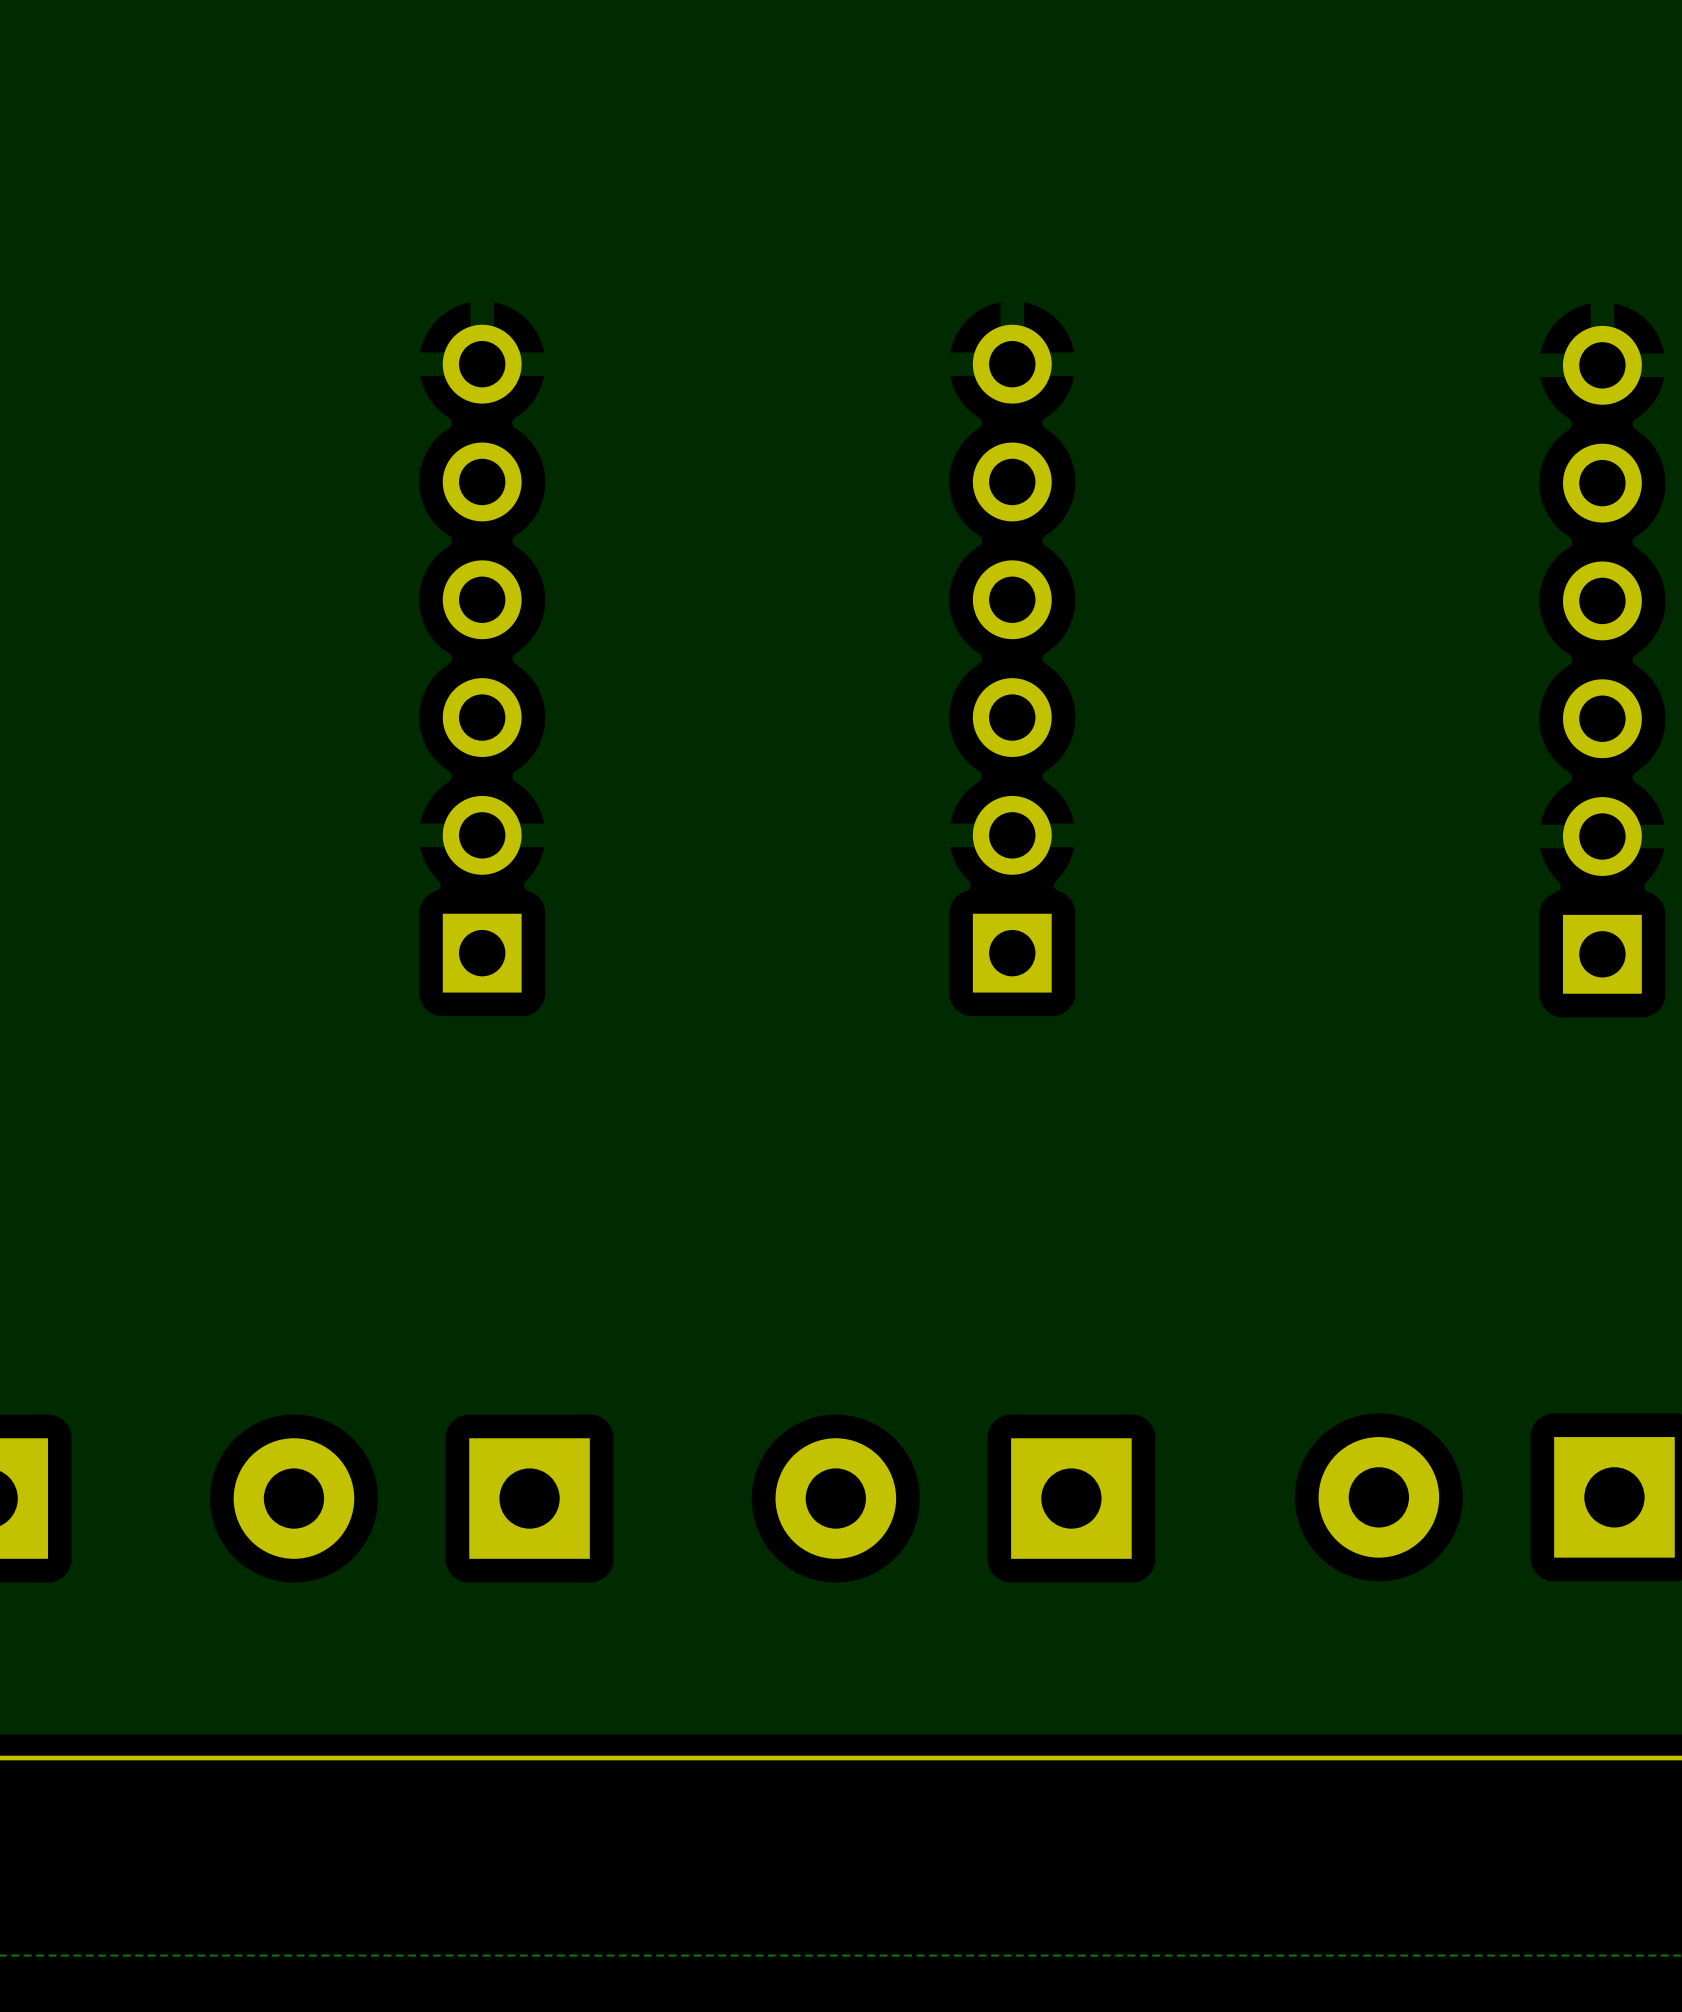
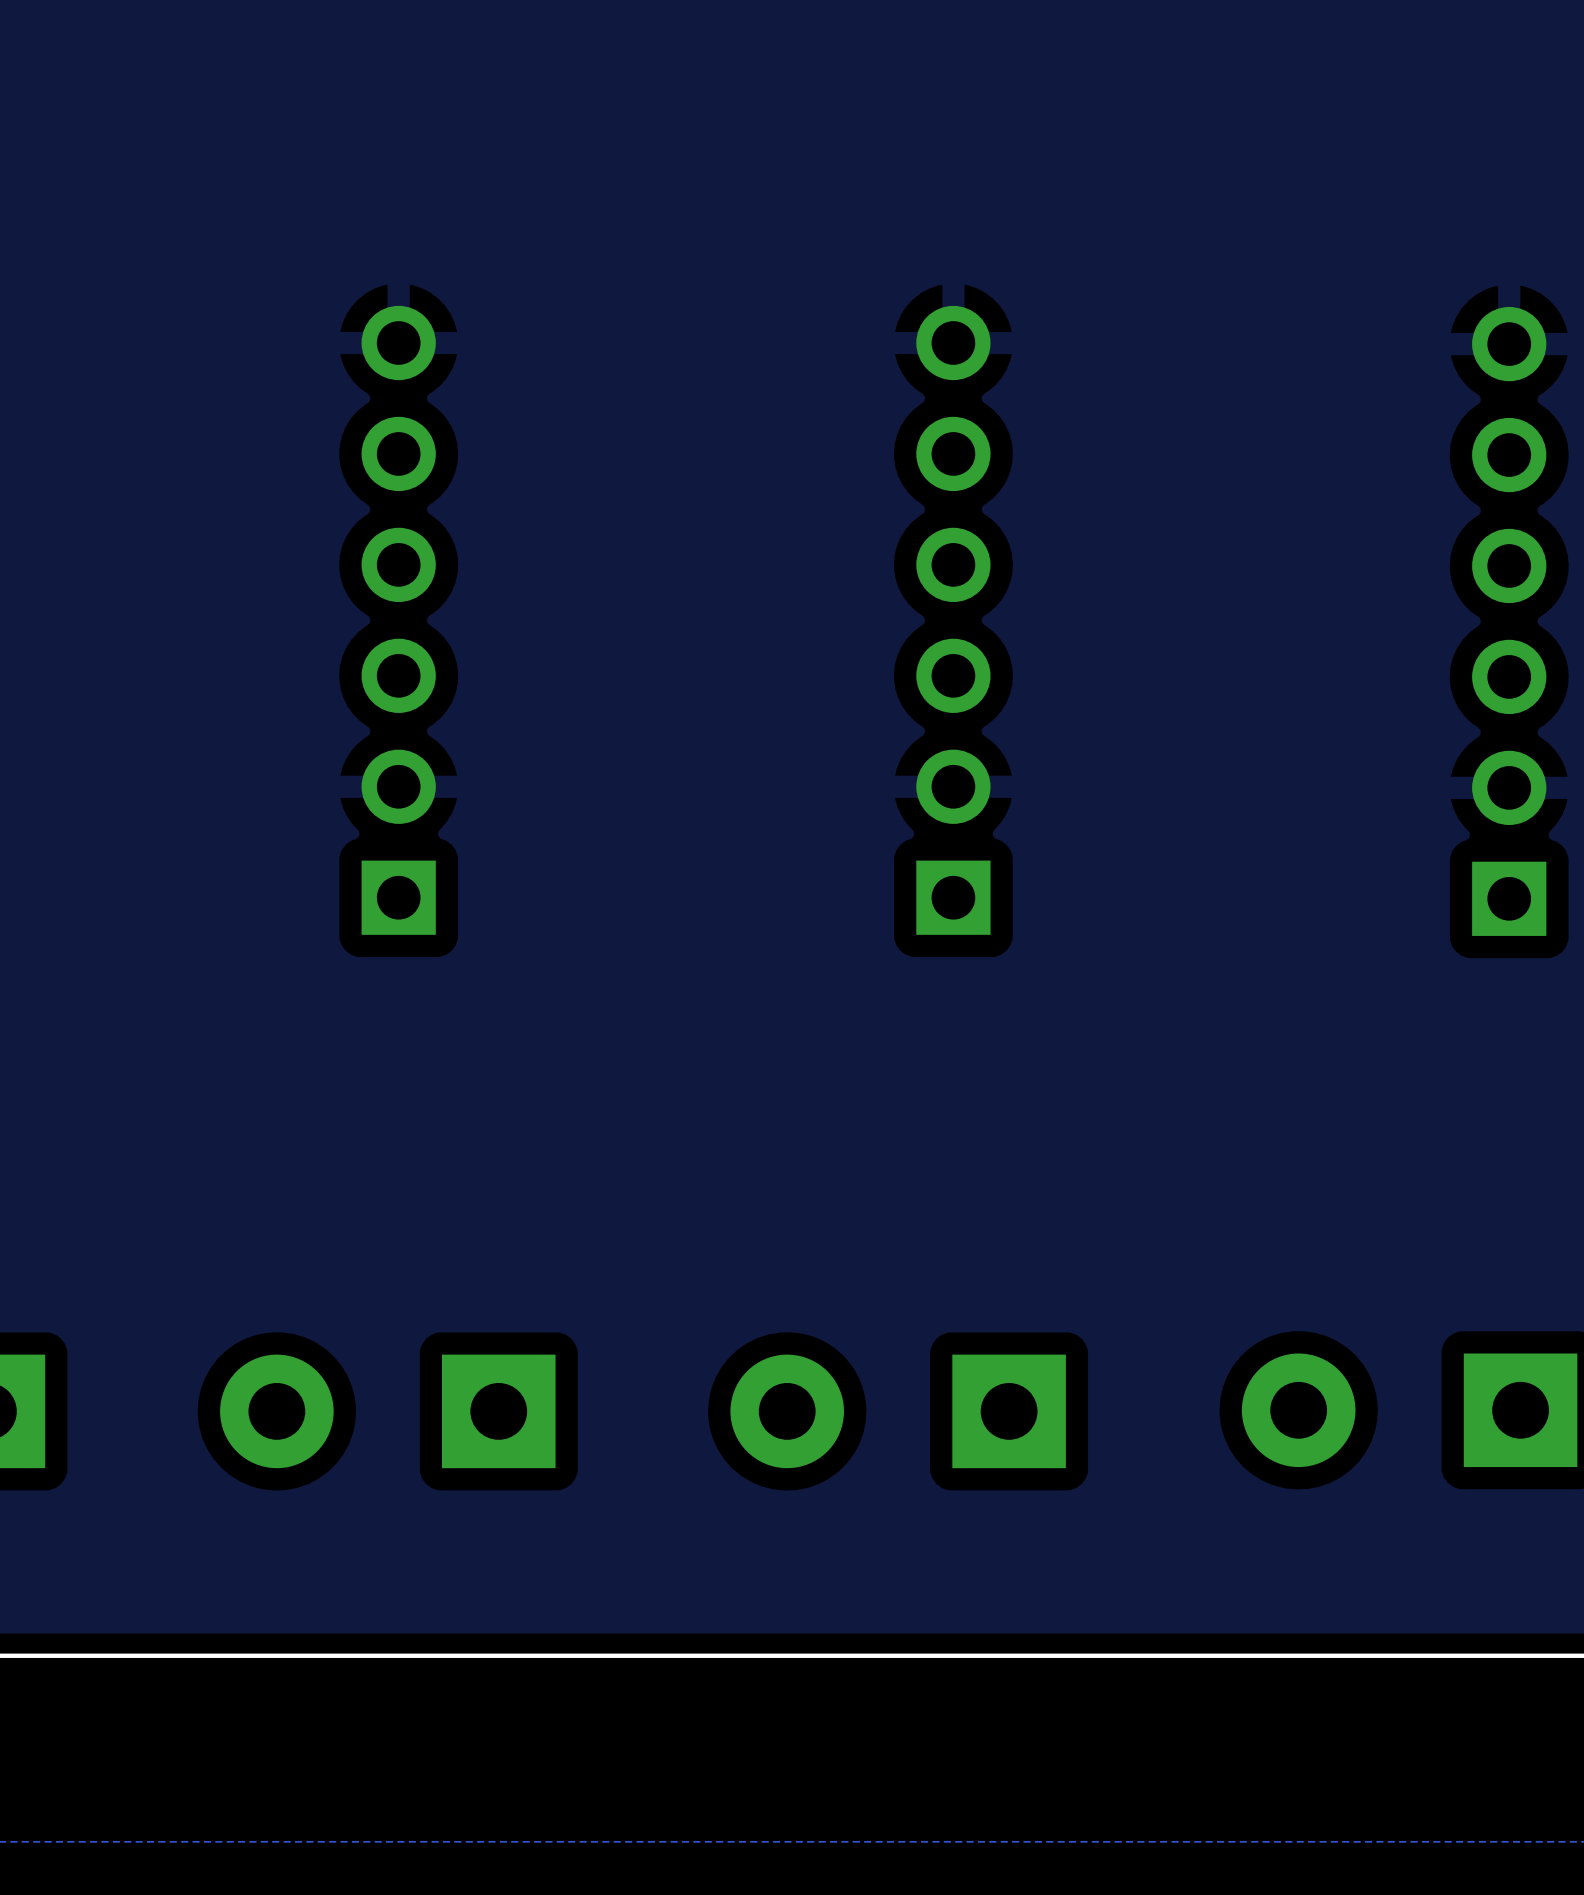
part position: (482, 658) -> (398, 620)

